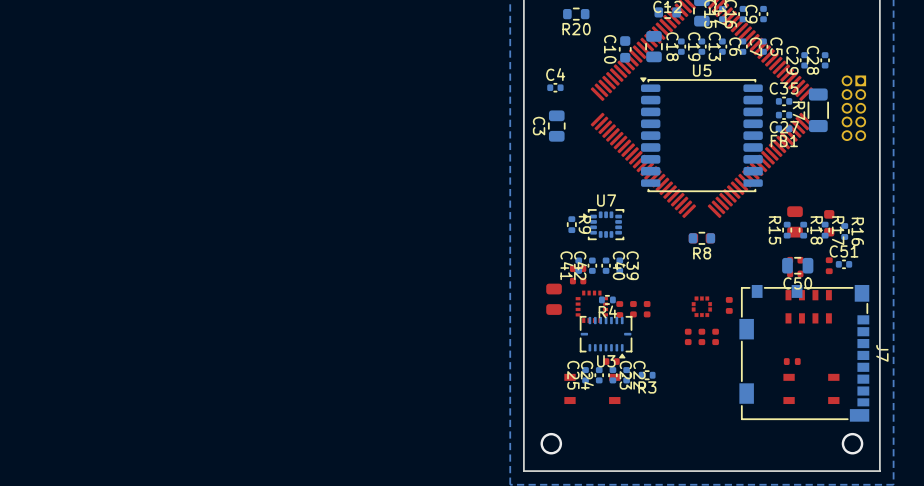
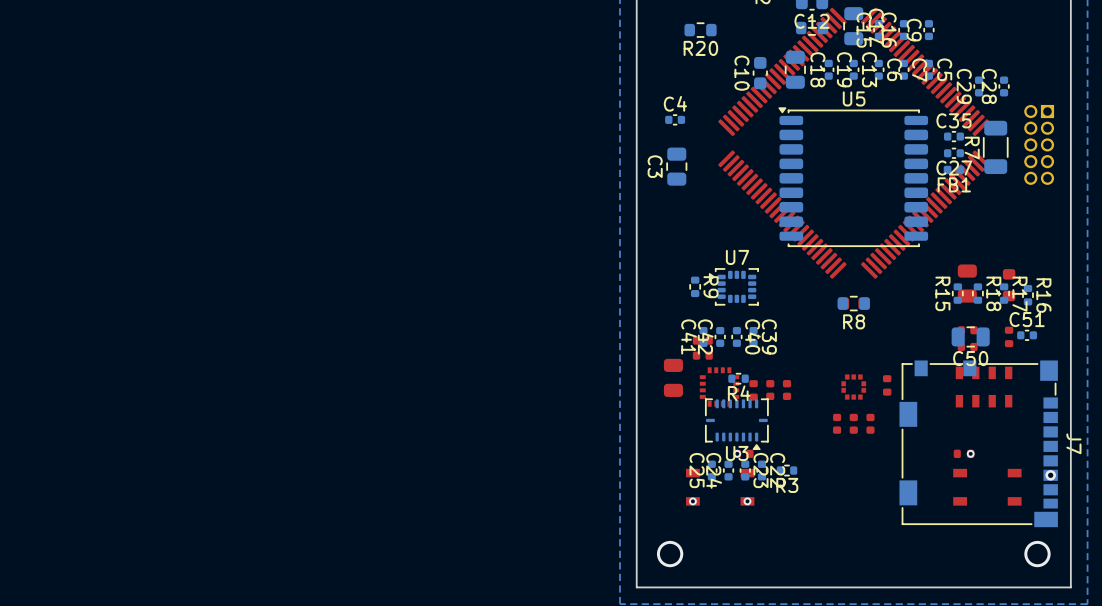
via: none -> (737, 453)
via: none -> (970, 453)
via: none -> (1050, 475)
via: none -> (692, 501)
via: none -> (747, 501)

